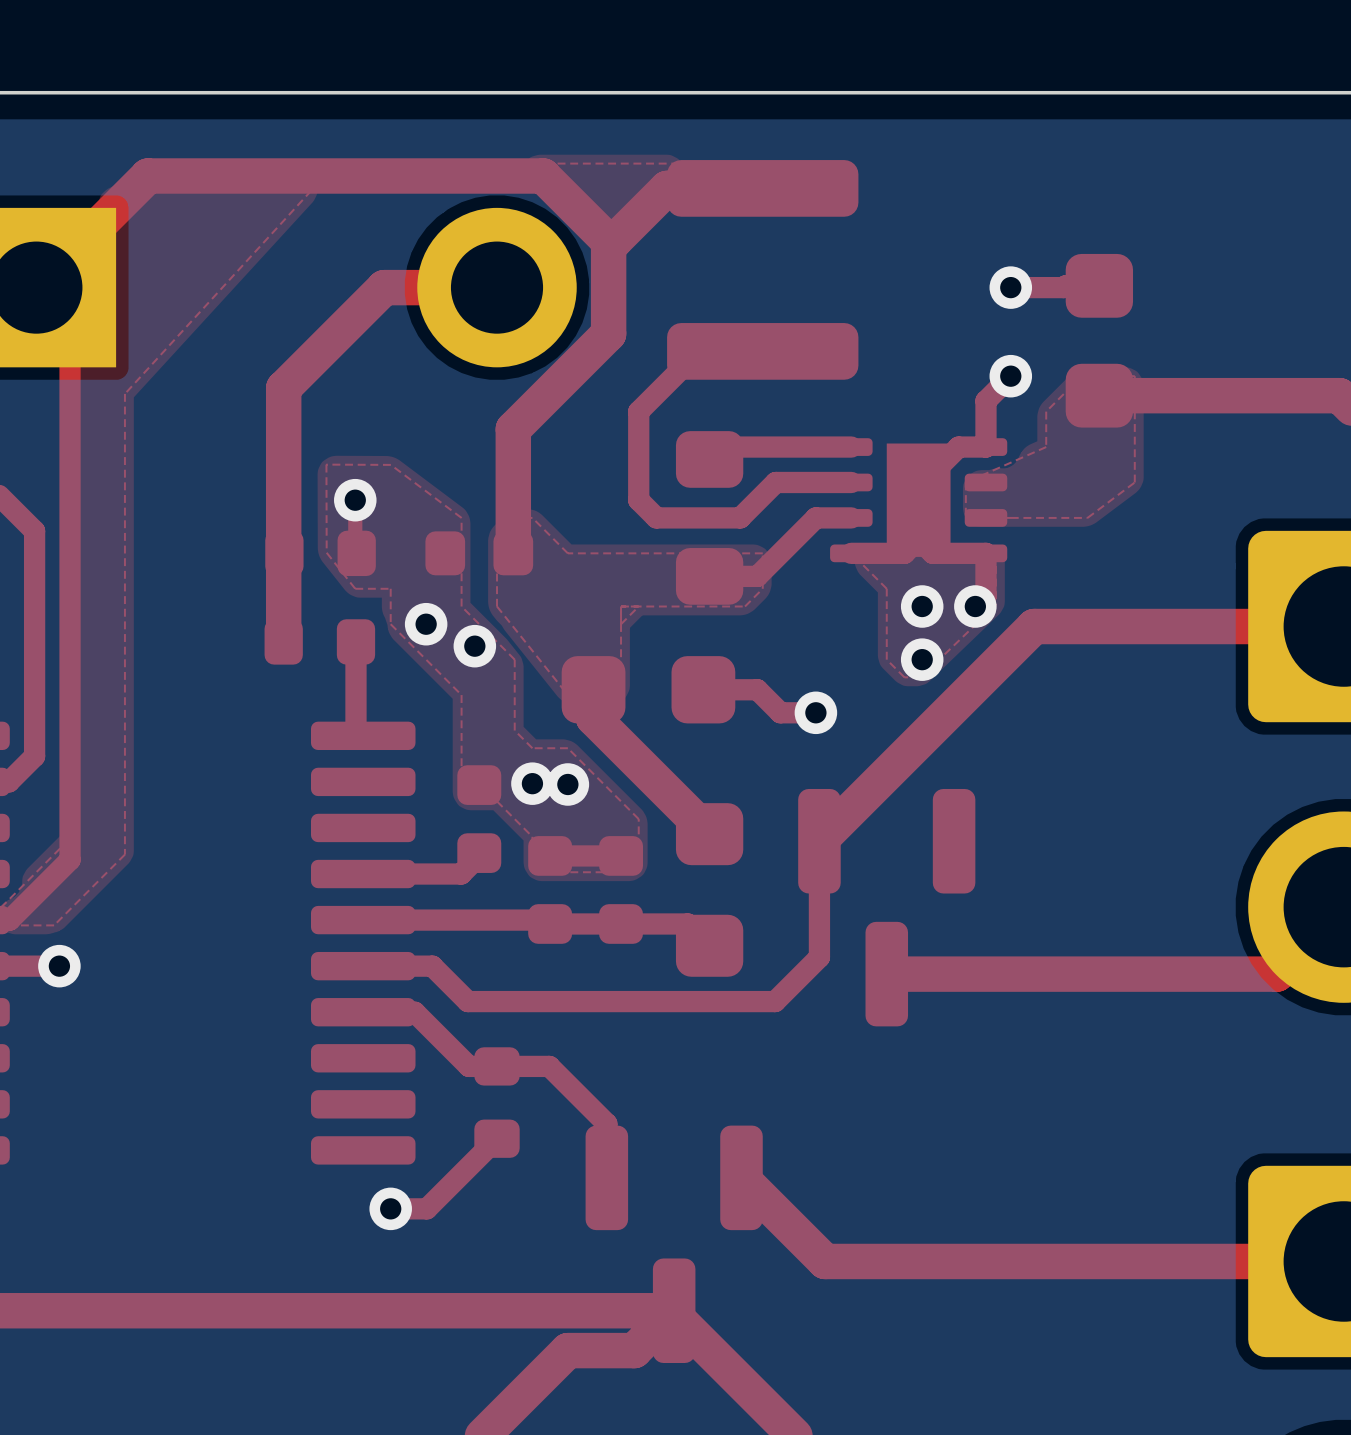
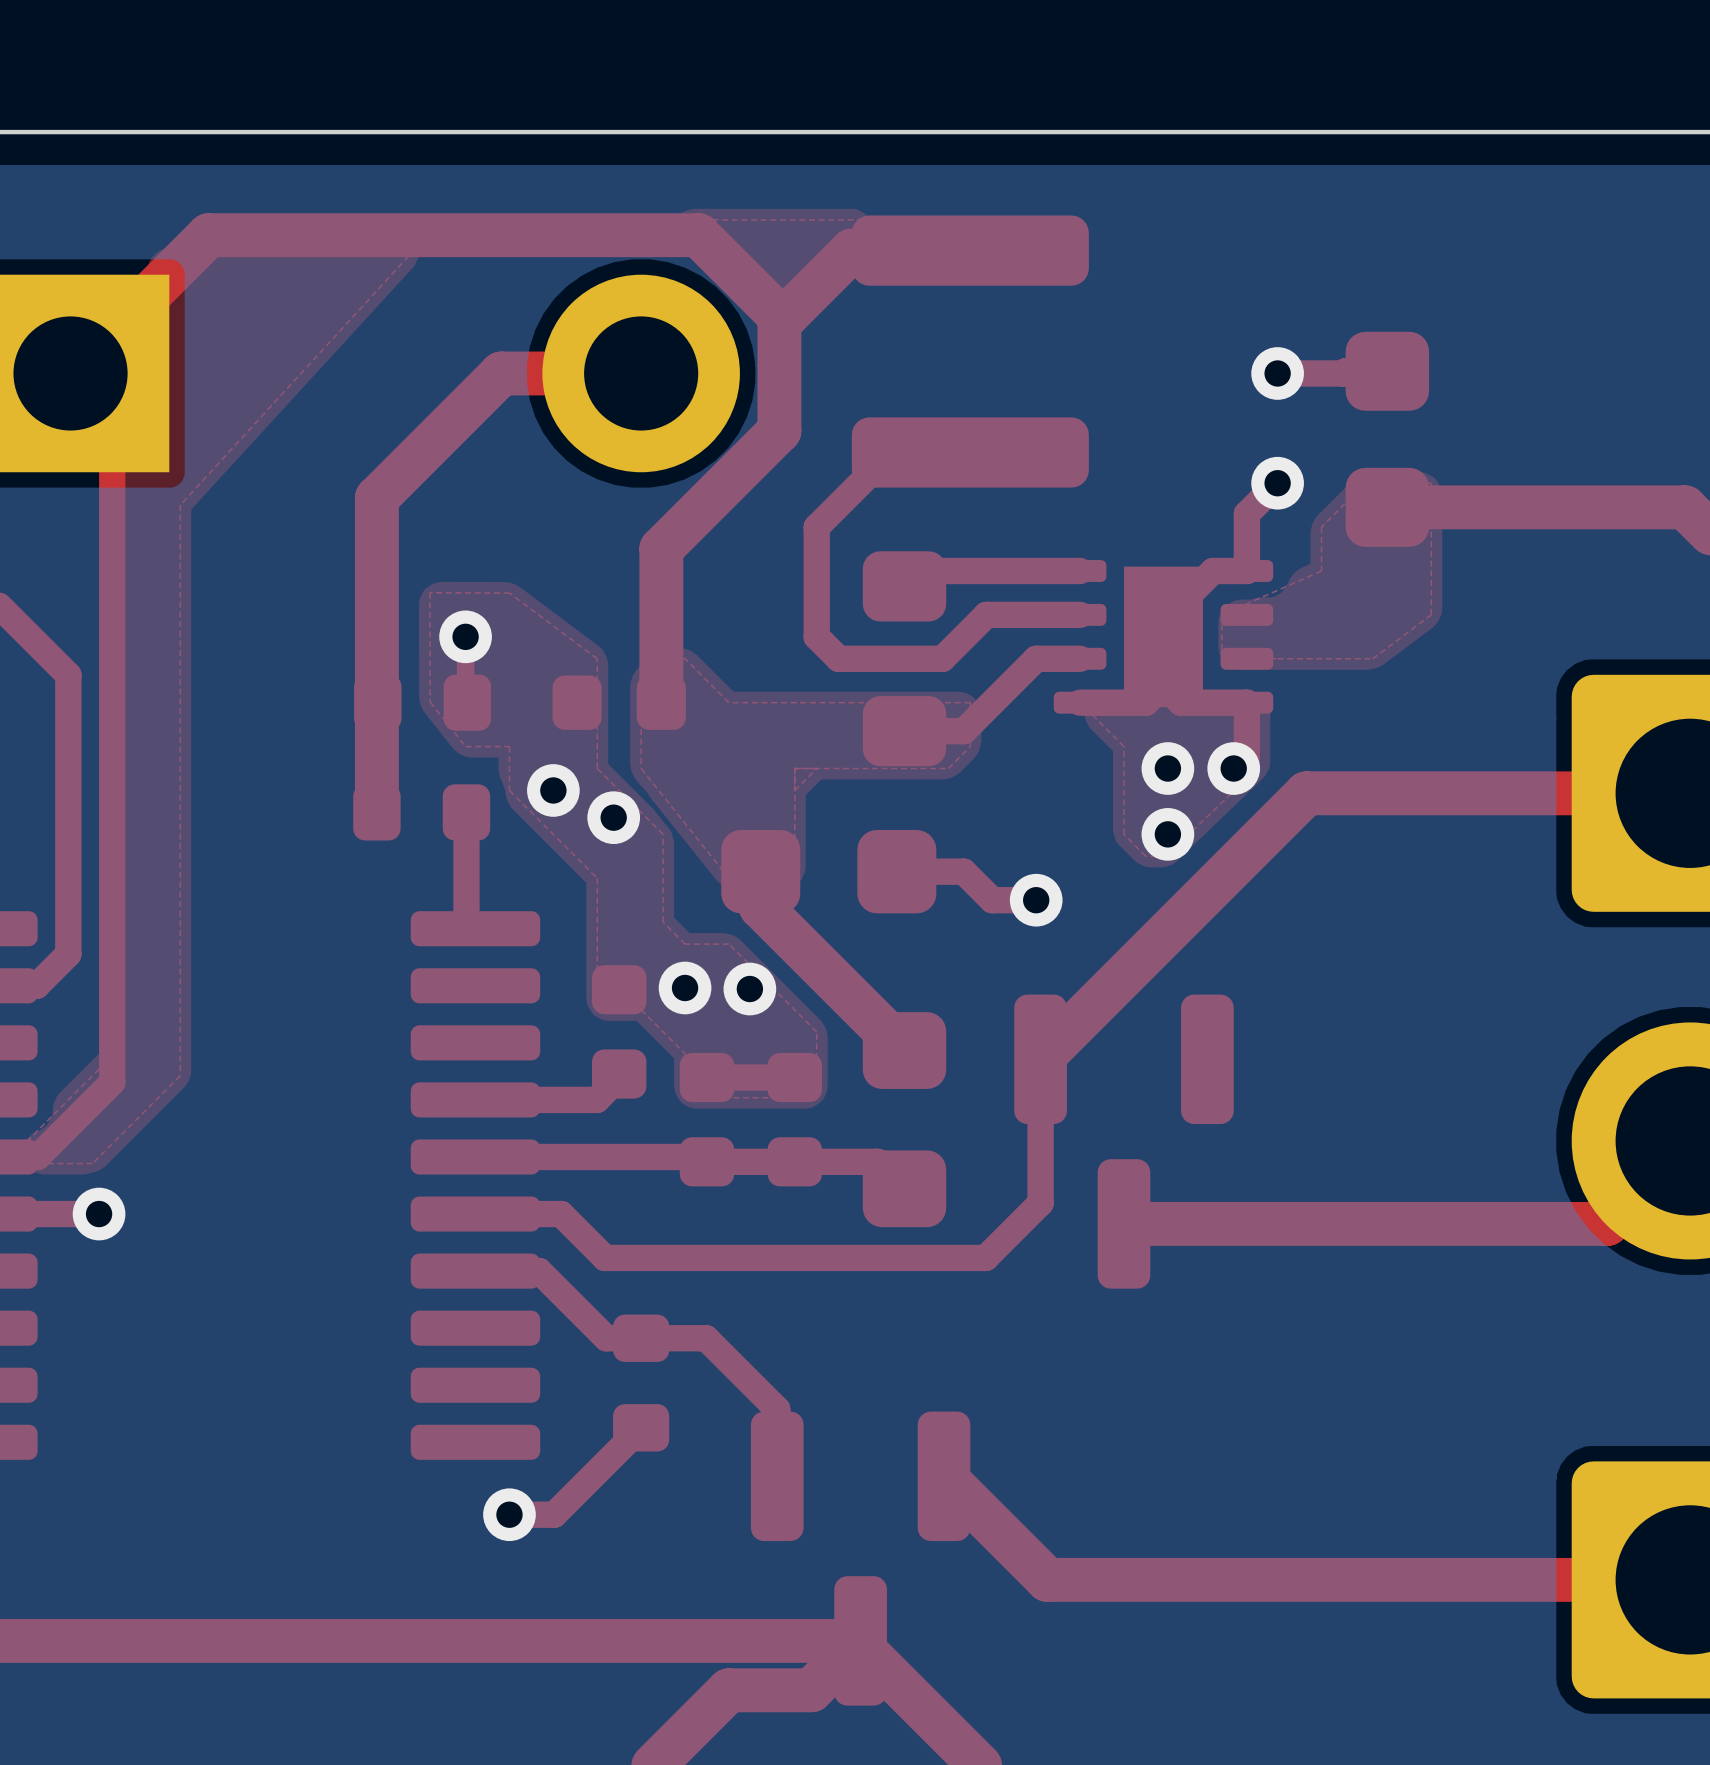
via position: (567, 784) -> (749, 989)

